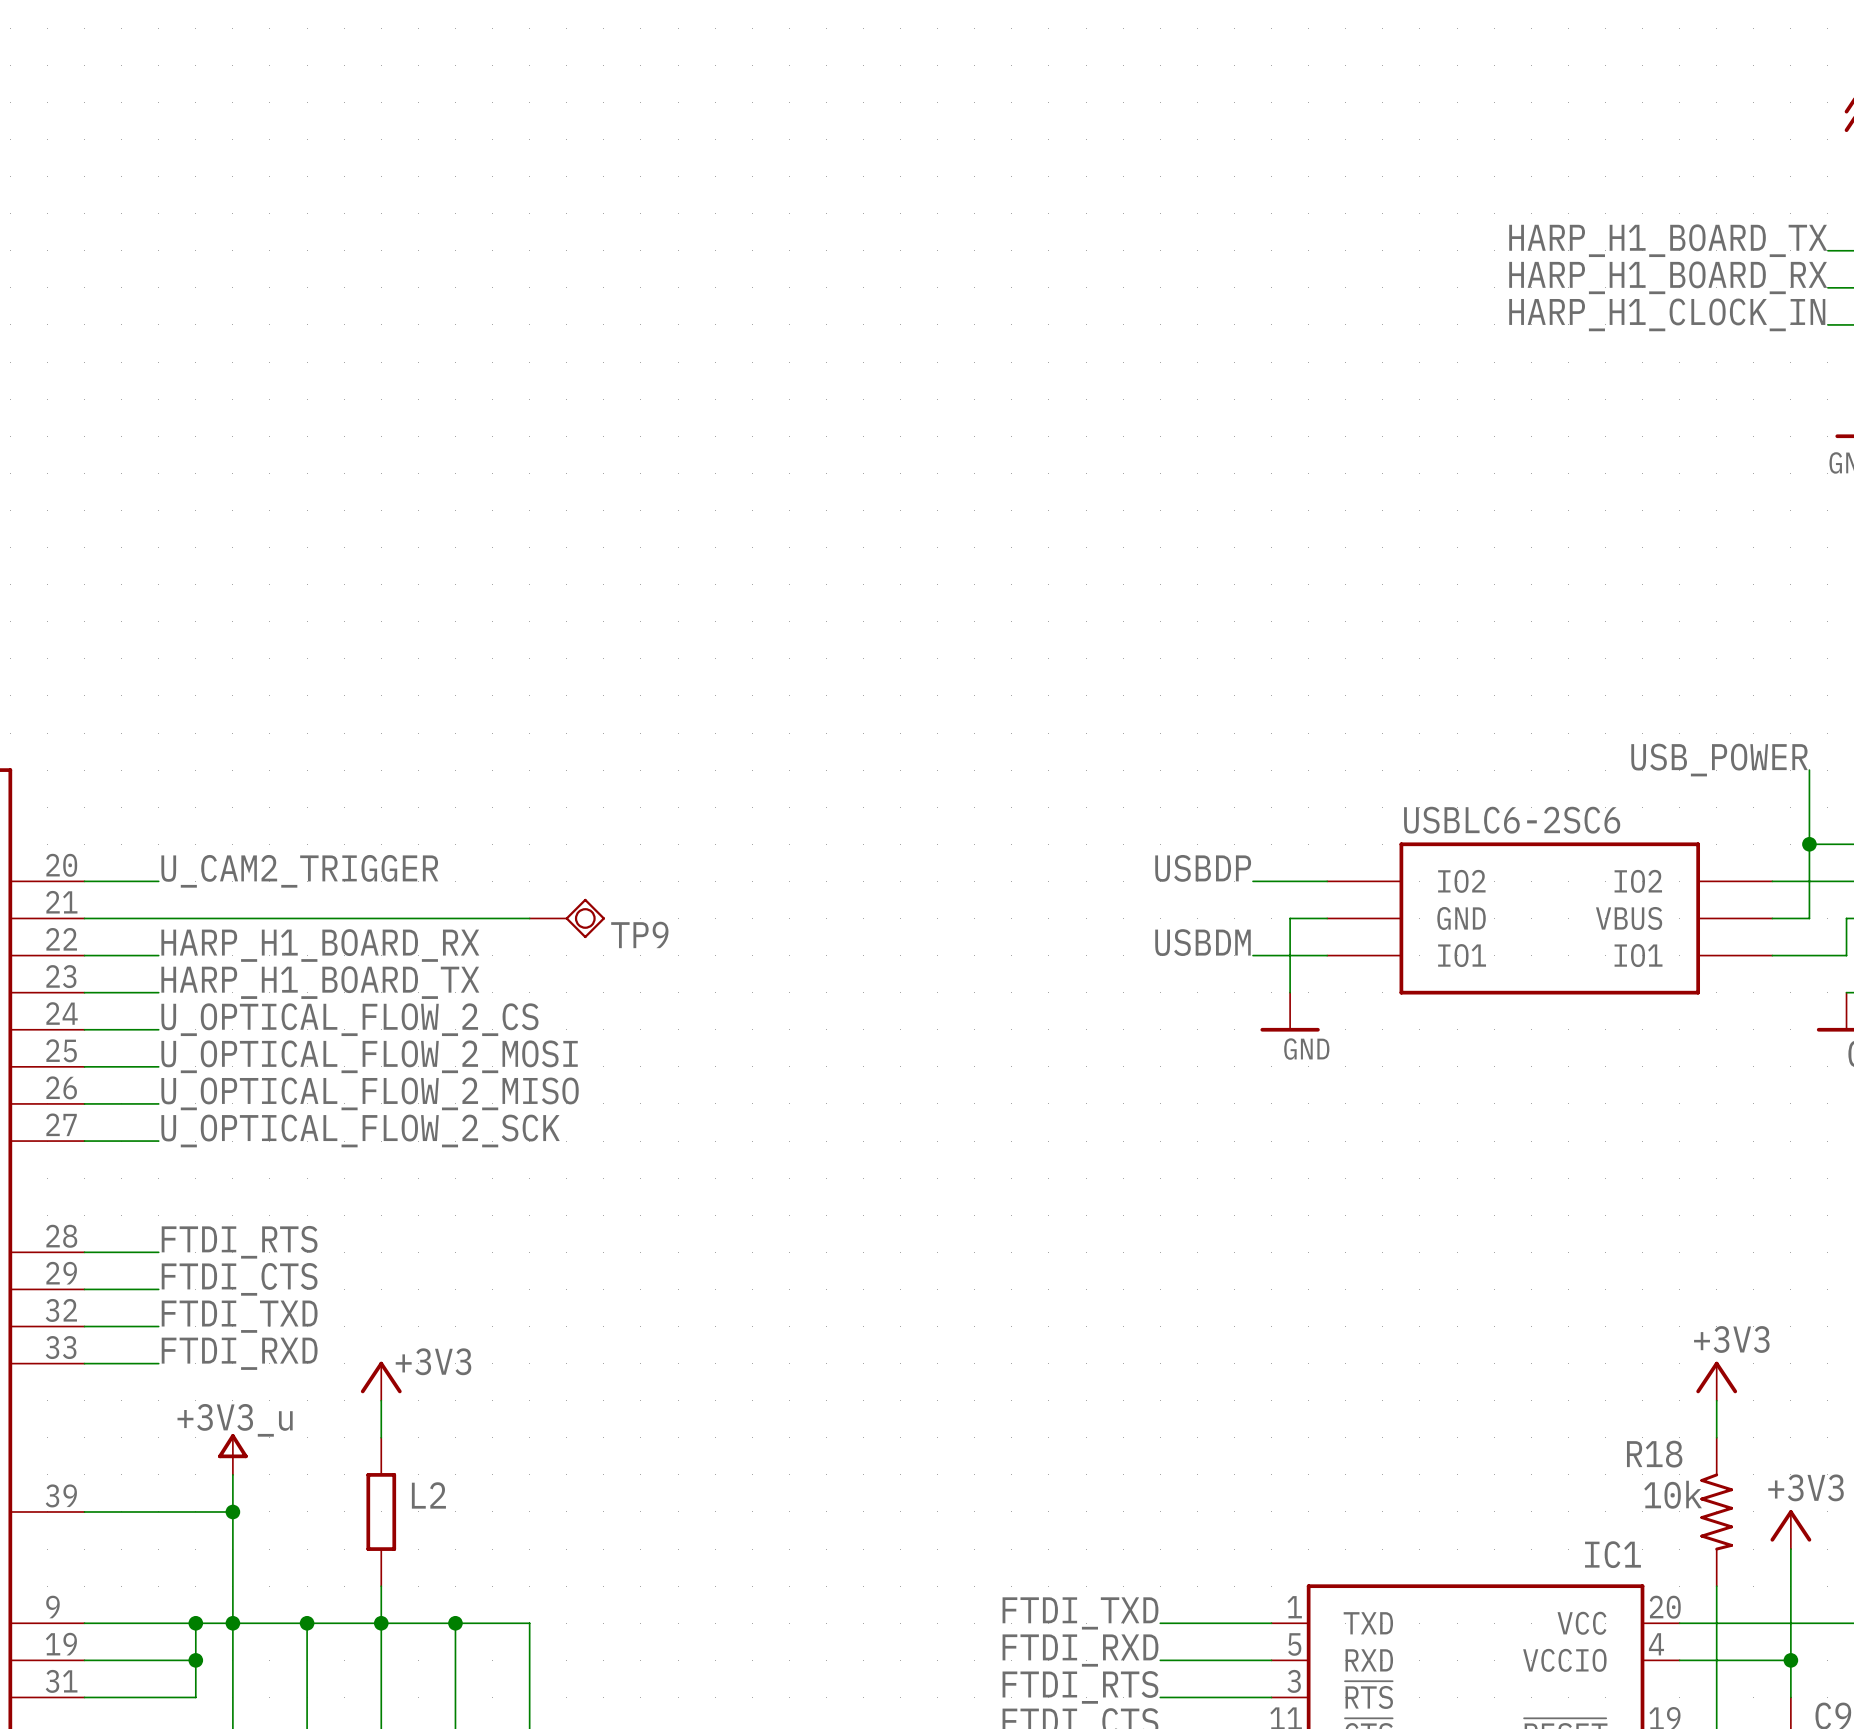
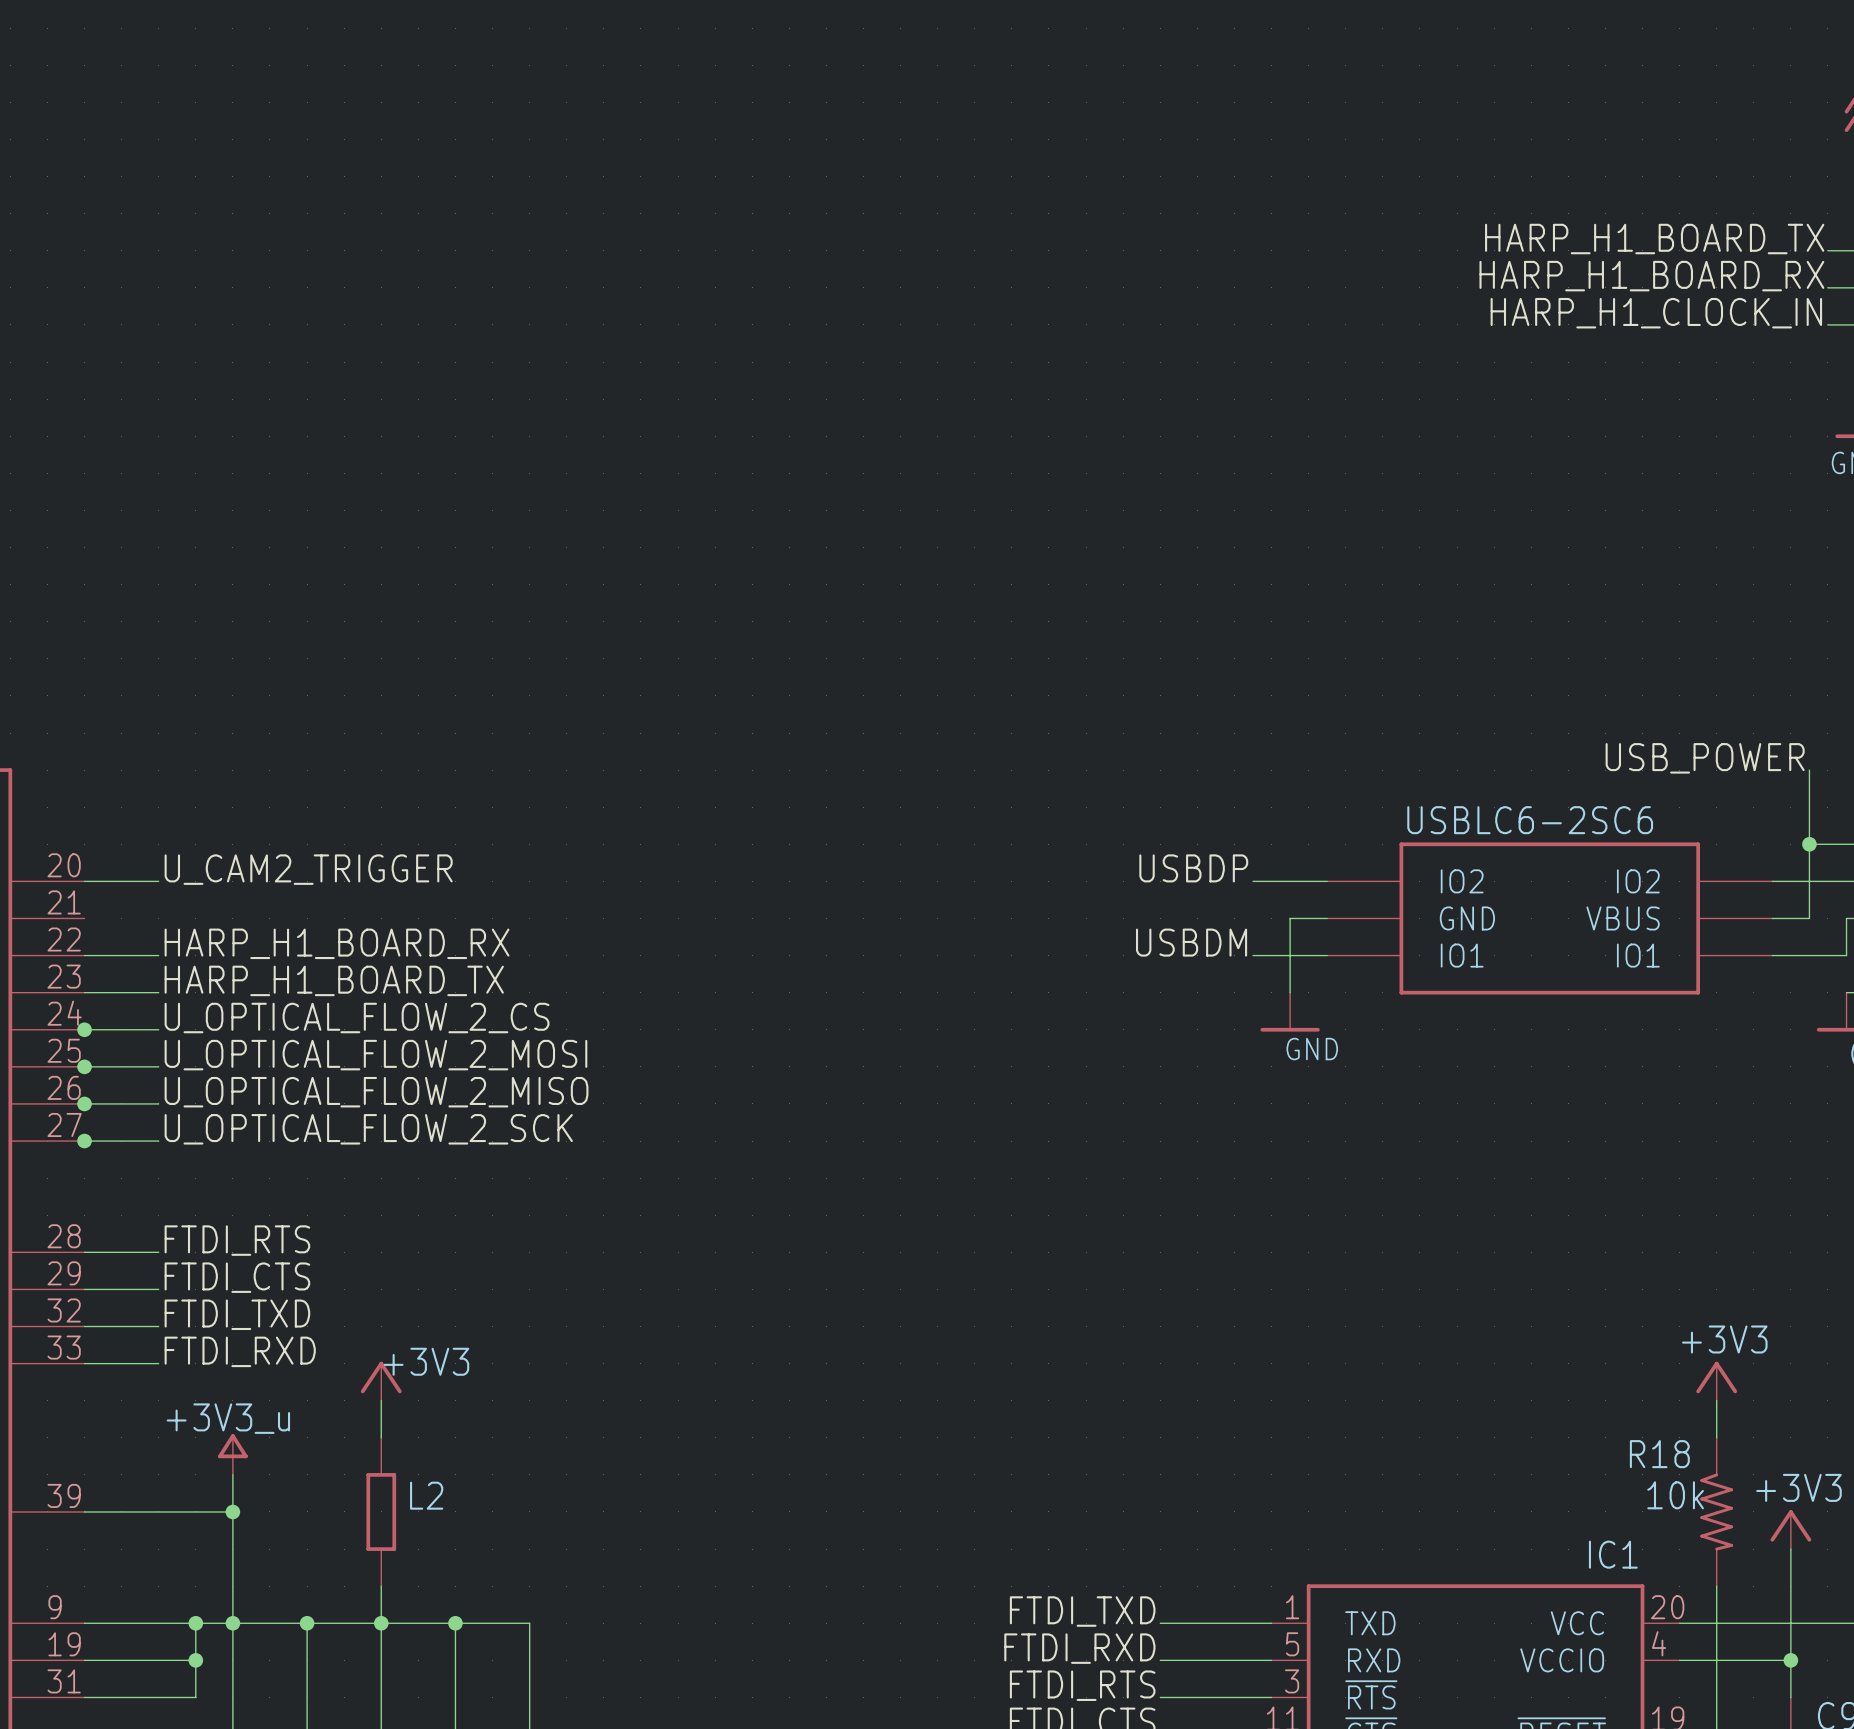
wire: (84, 918) (529, 918) -> none
TP9: (567, 918) -> none
junction: none -> (84, 1029)
junction: none -> (84, 1066)
junction: none -> (84, 1103)
junction: none -> (84, 1141)

